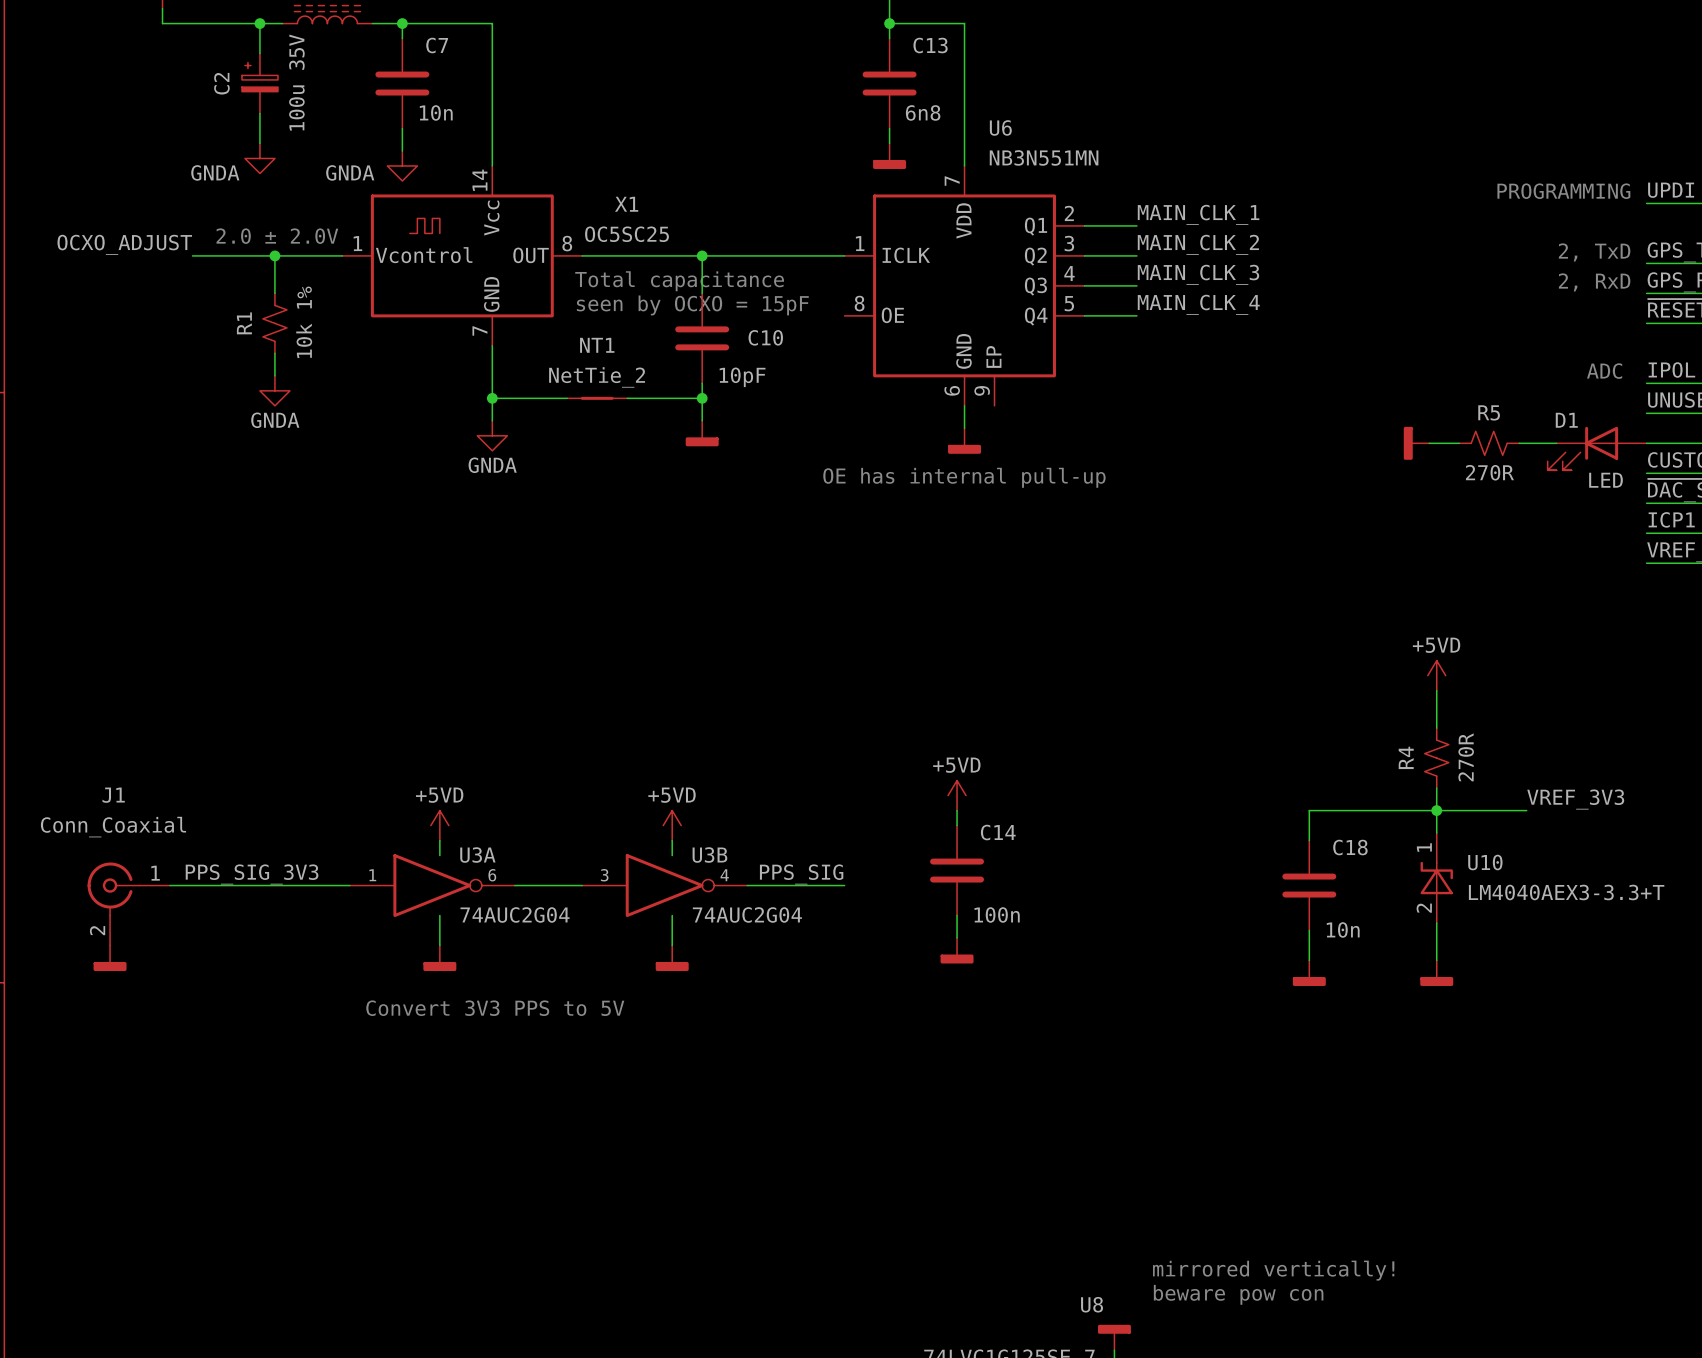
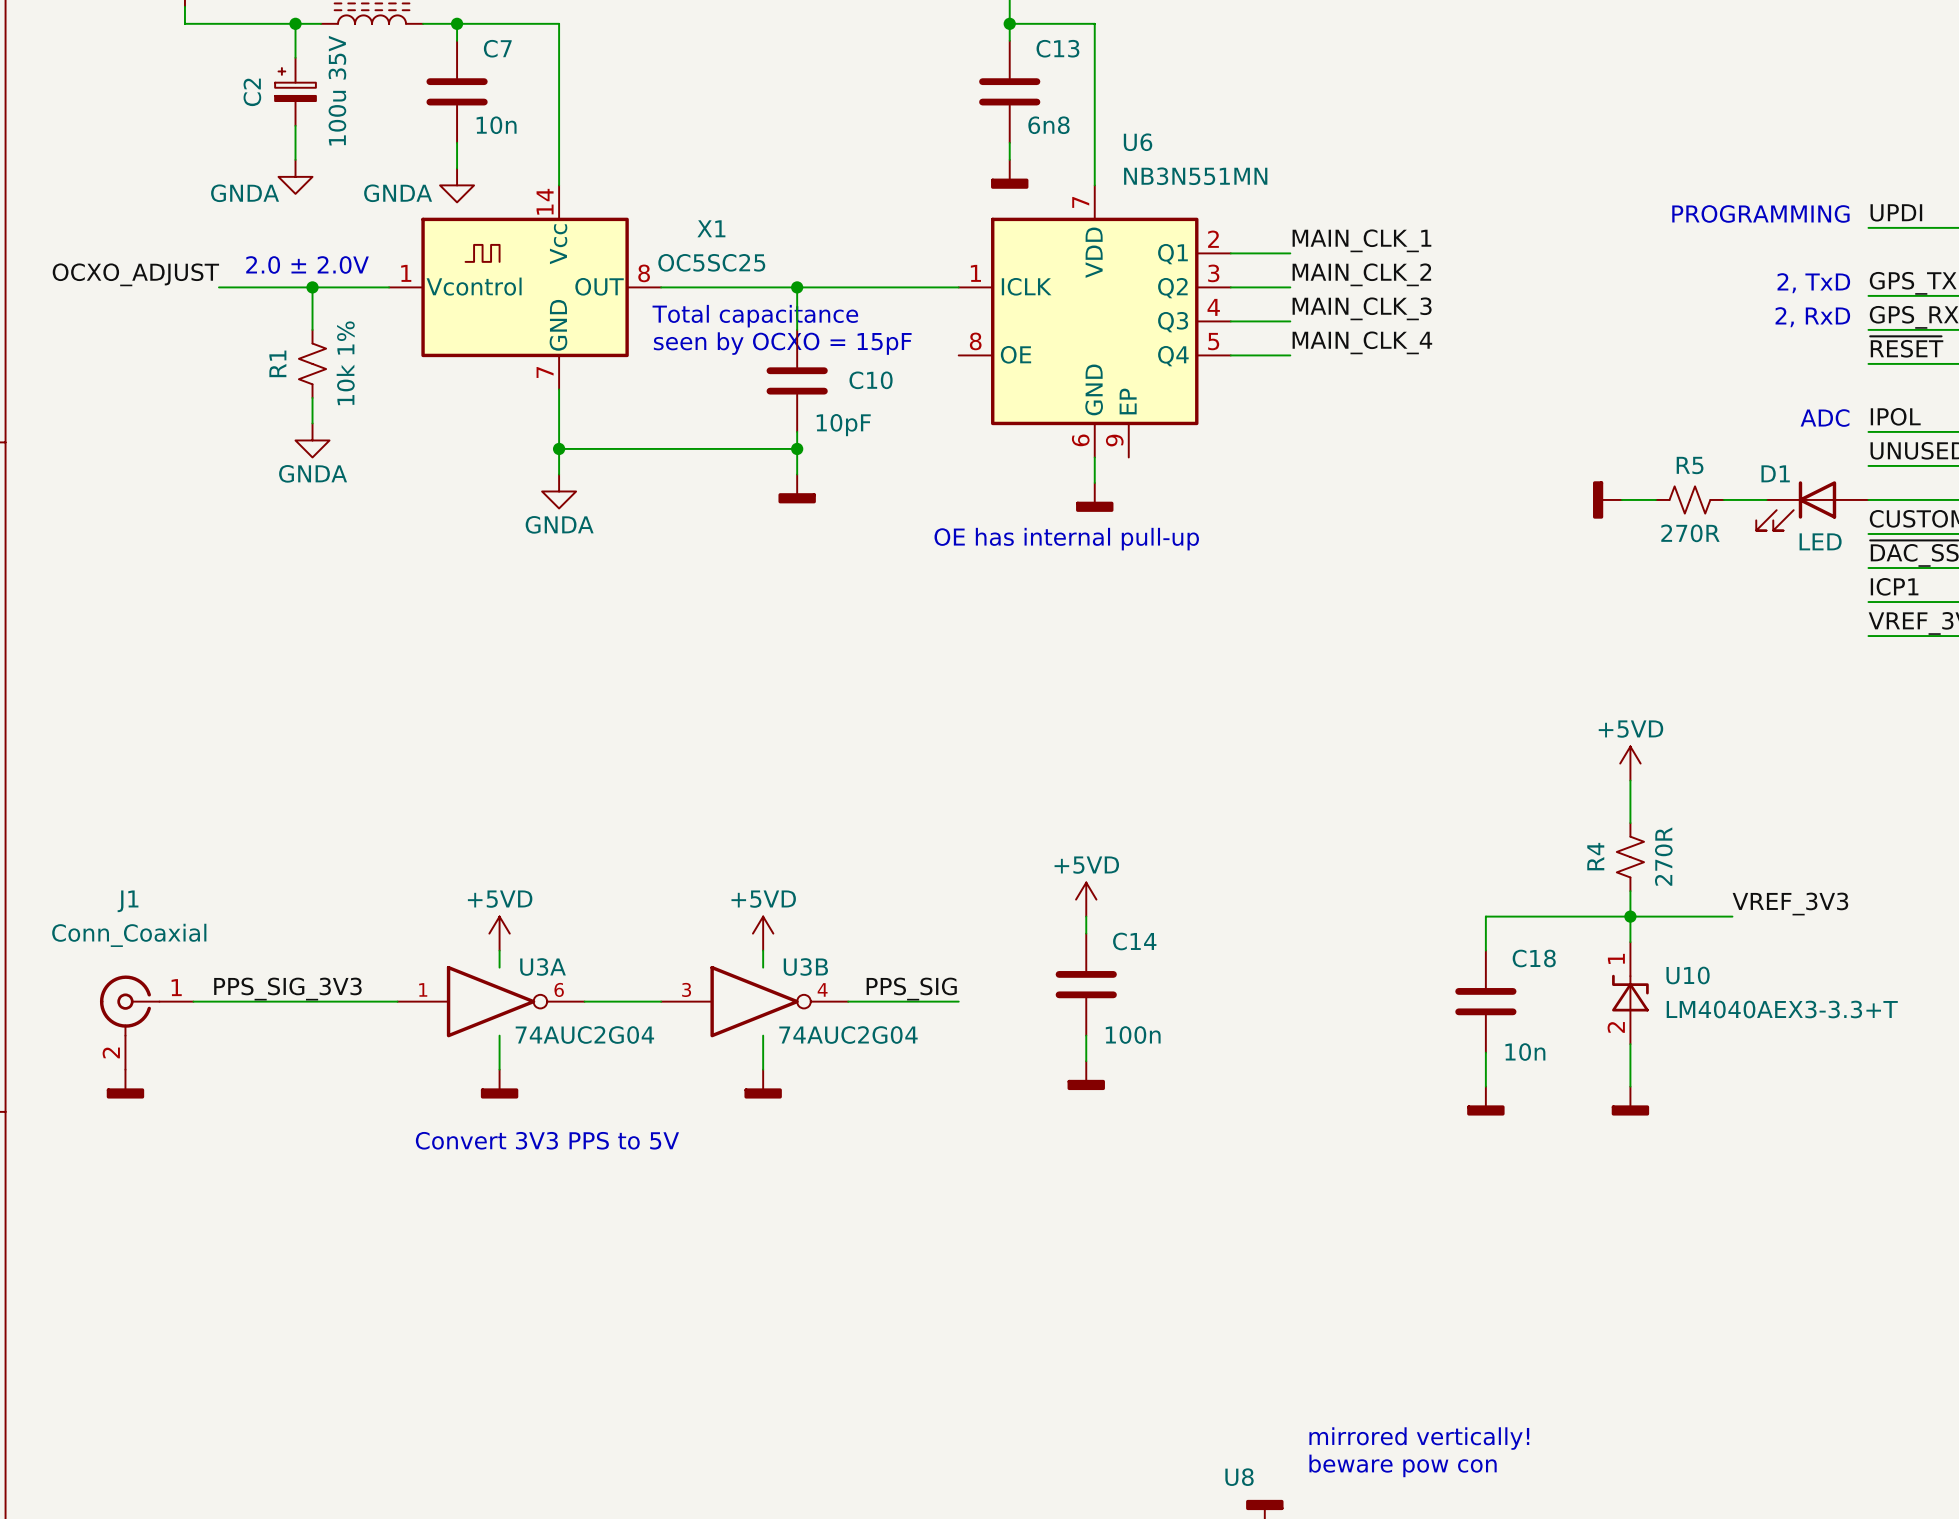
NT1: NetTie_2 (597, 398) -> none

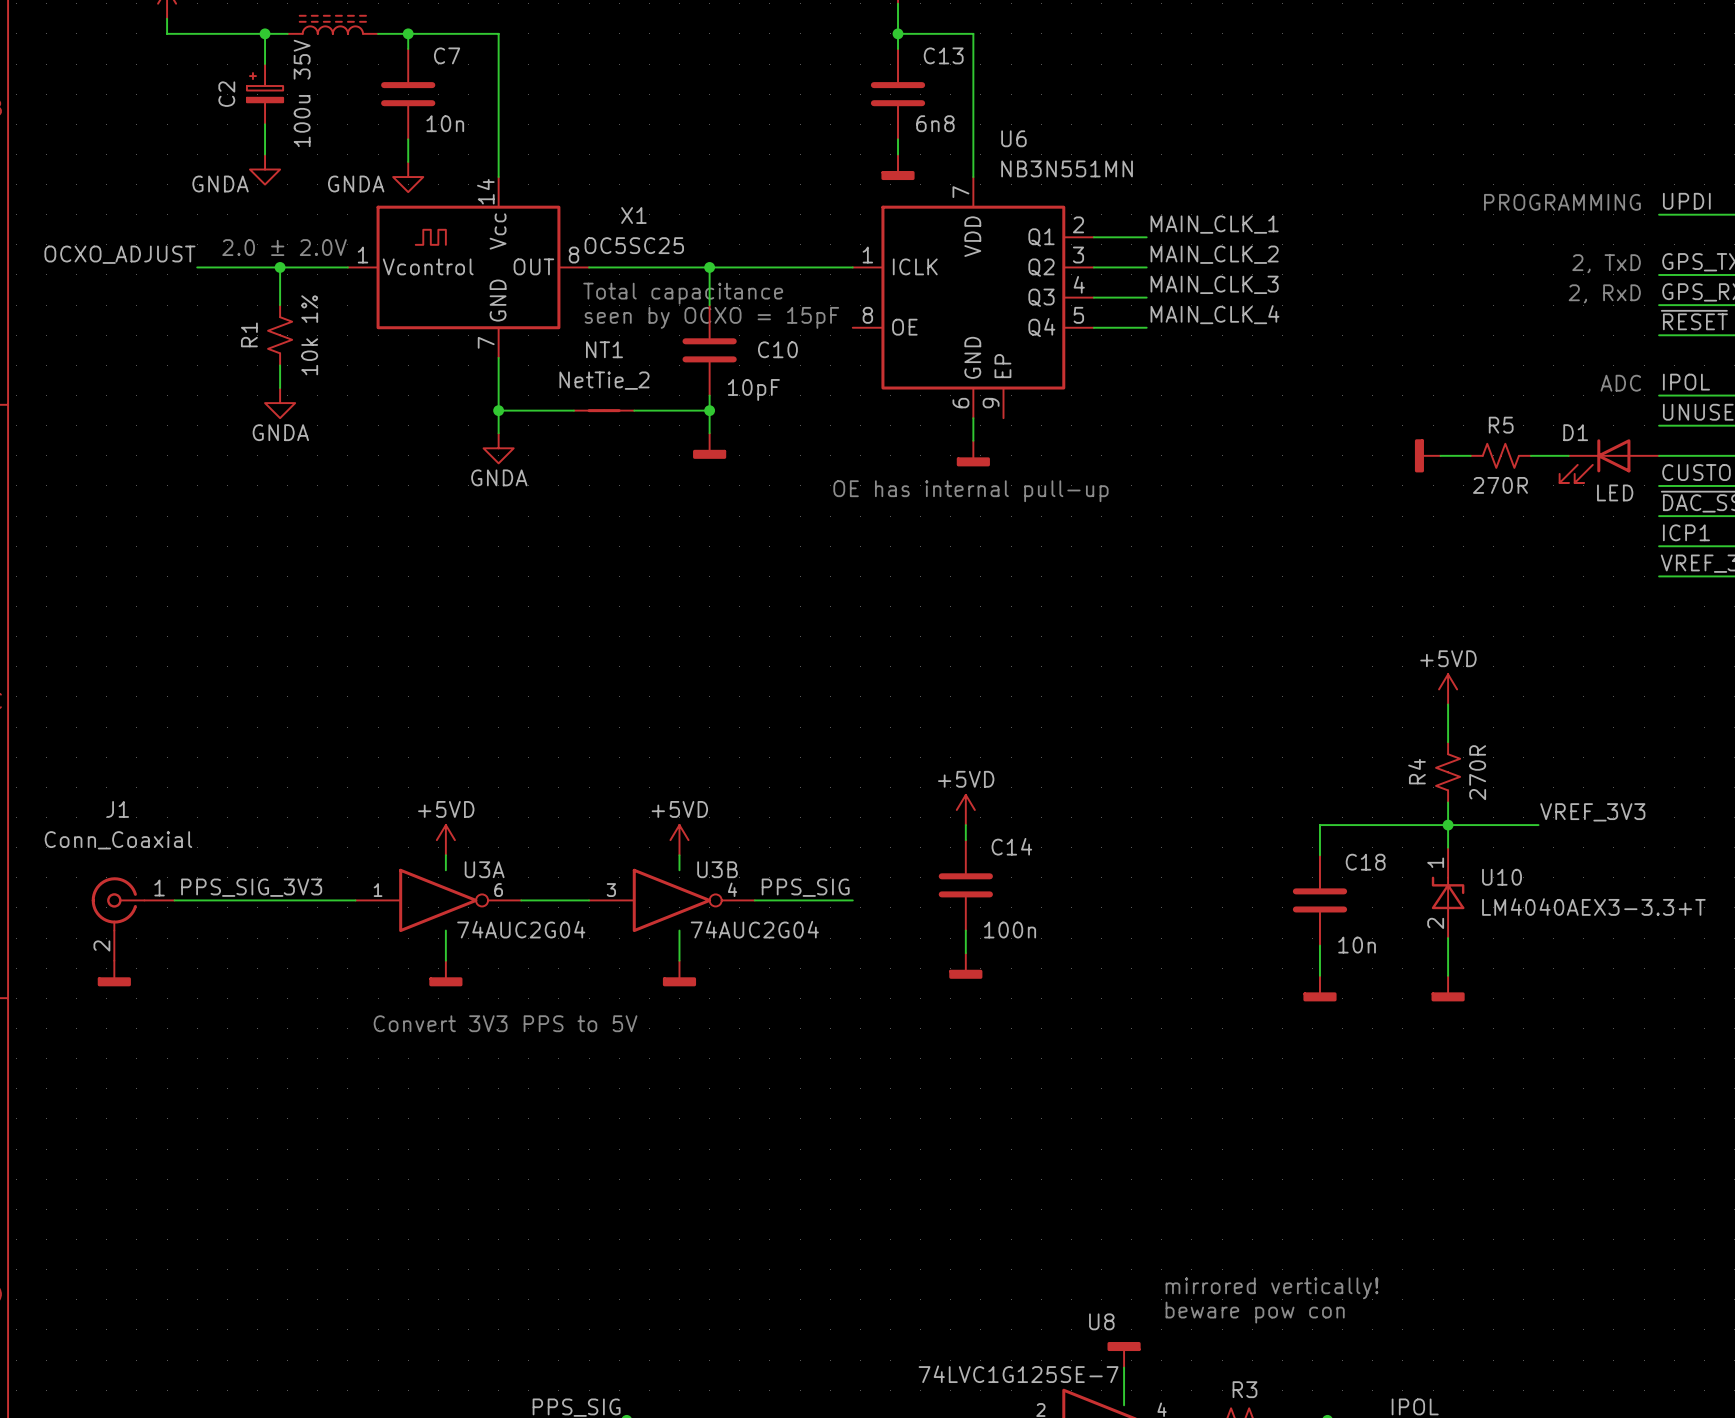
NT1: none -> NetTie_2 (604, 410)

